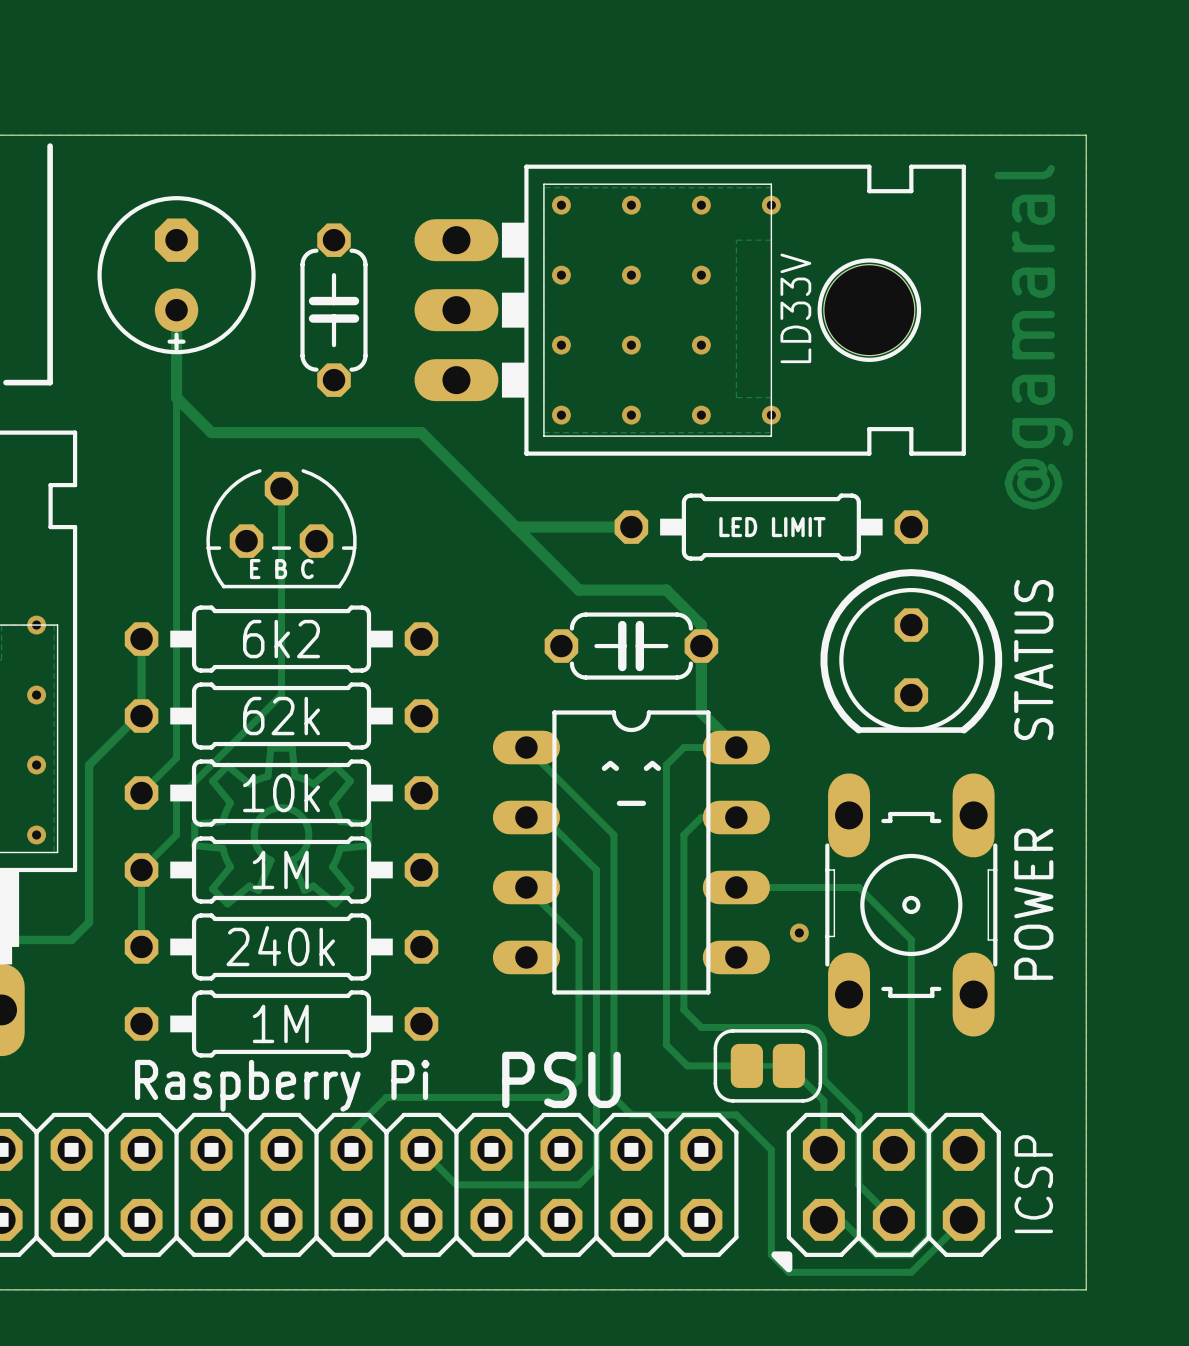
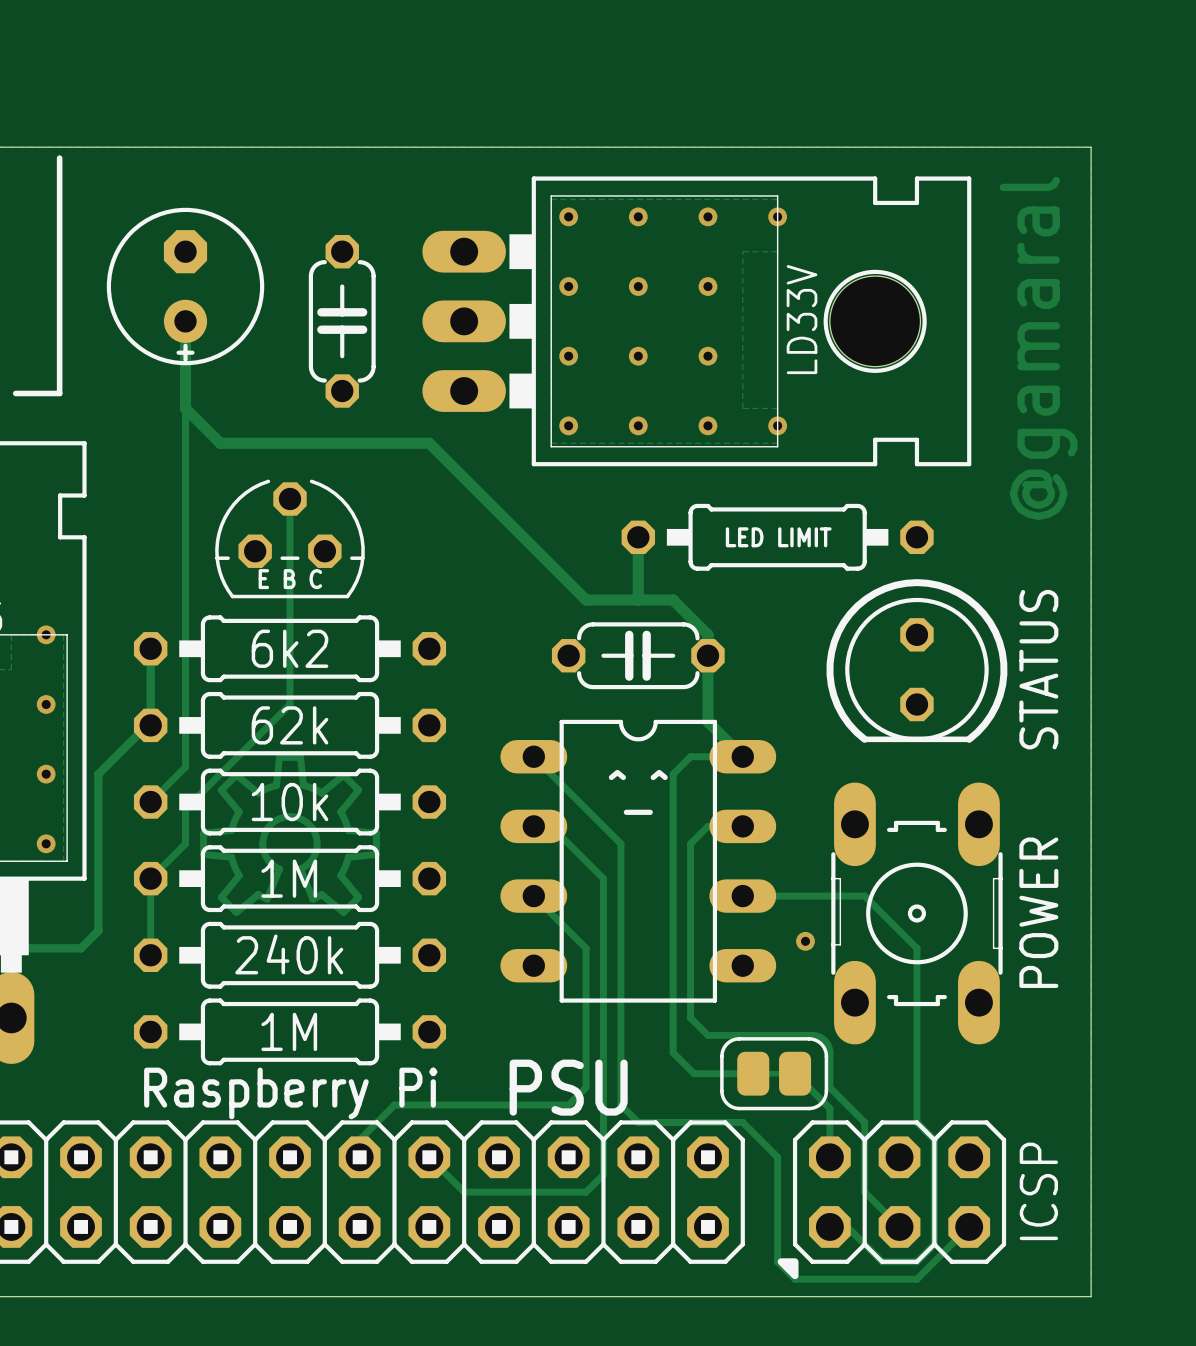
track: (515, 527) (631, 527) -> (638, 600) (638, 537)

